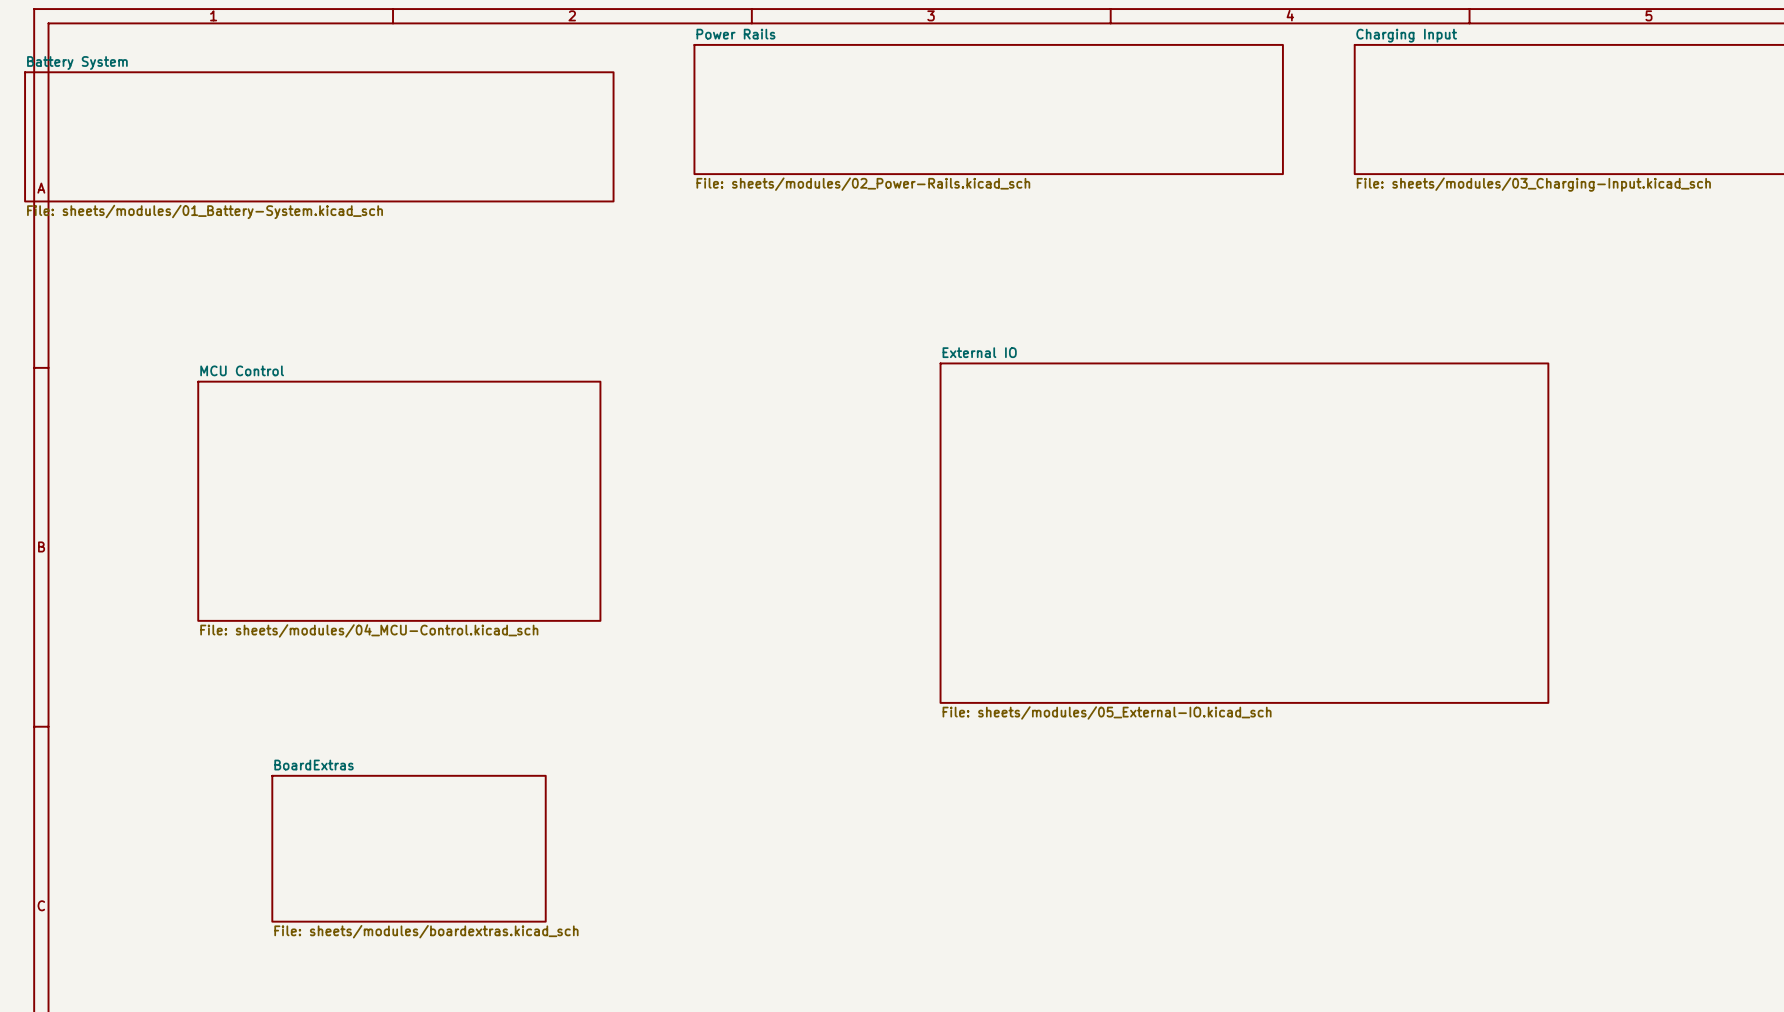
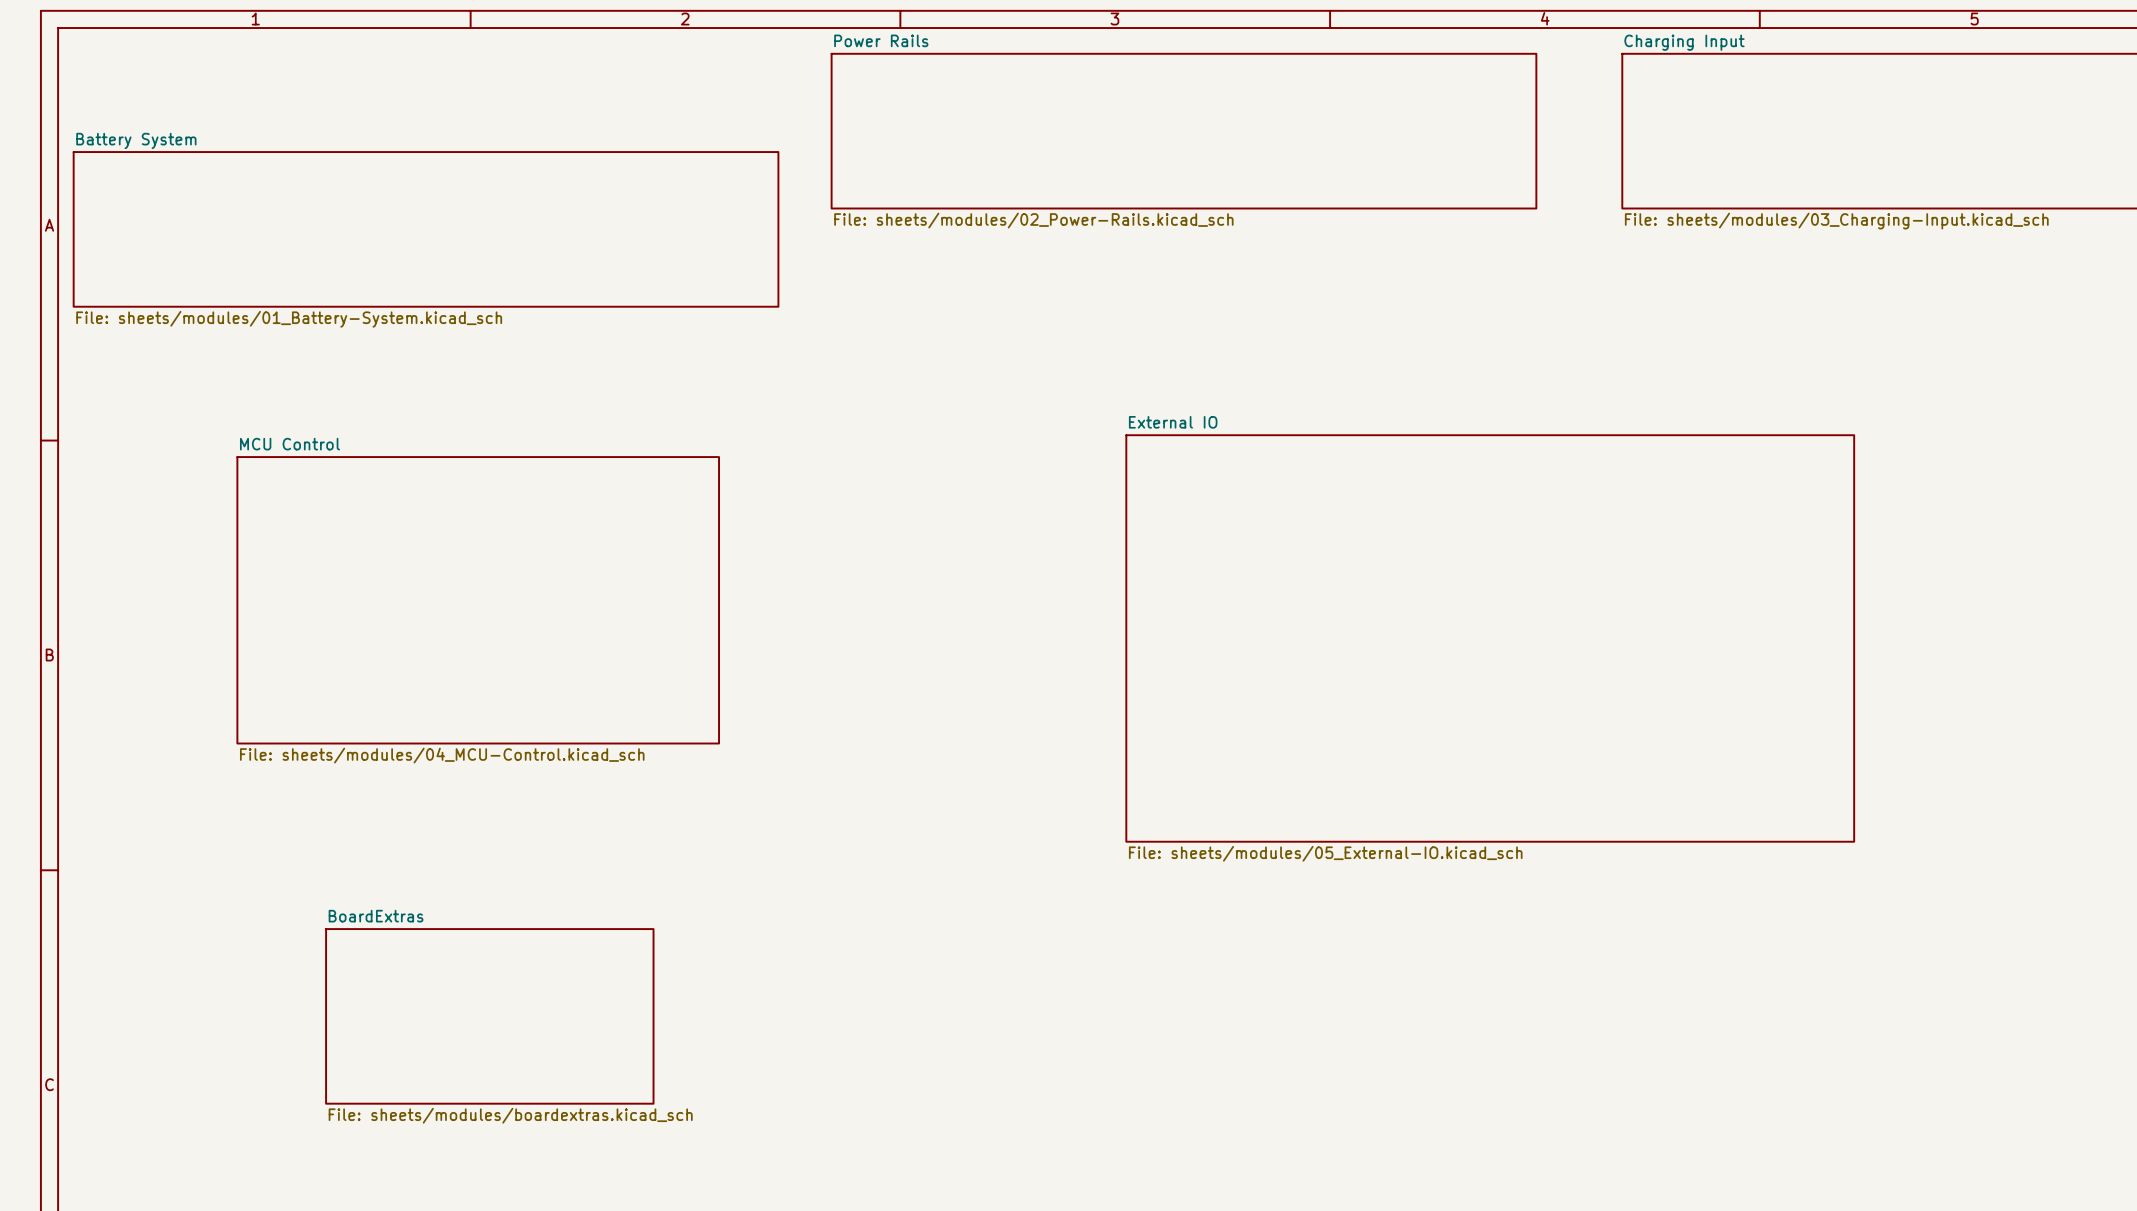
sheet Battery System position: (319, 136) -> (426, 229)

